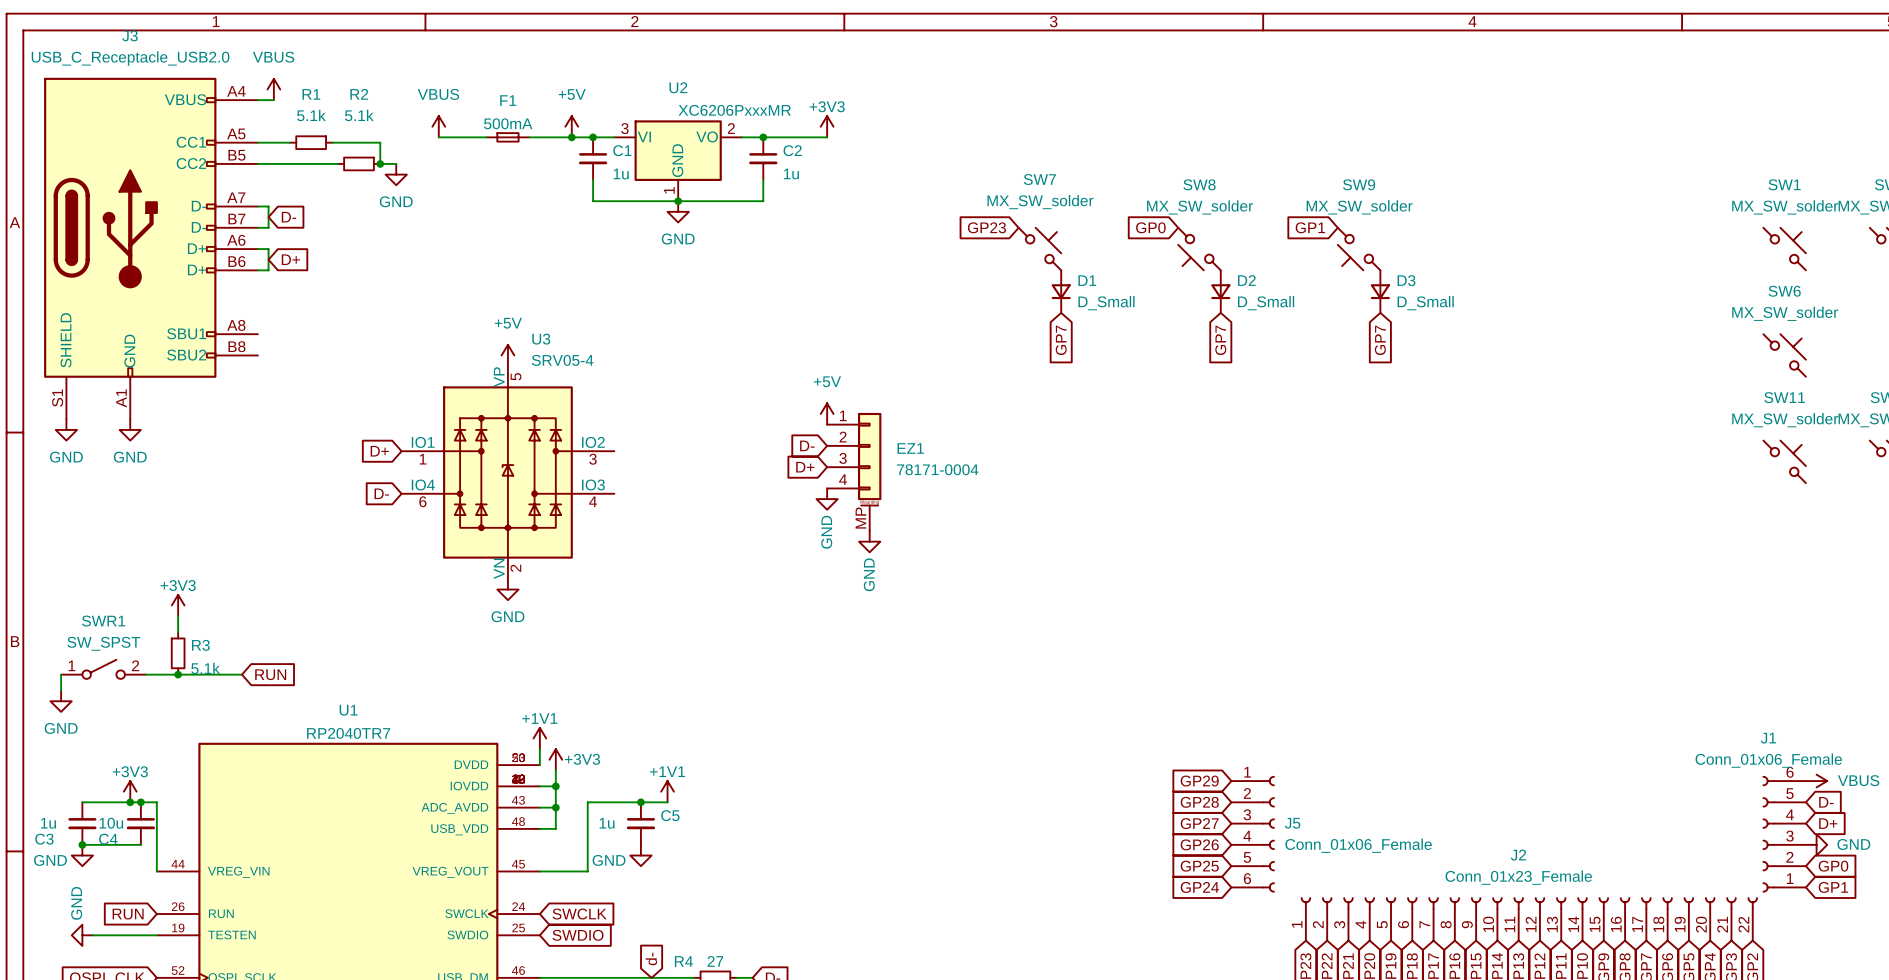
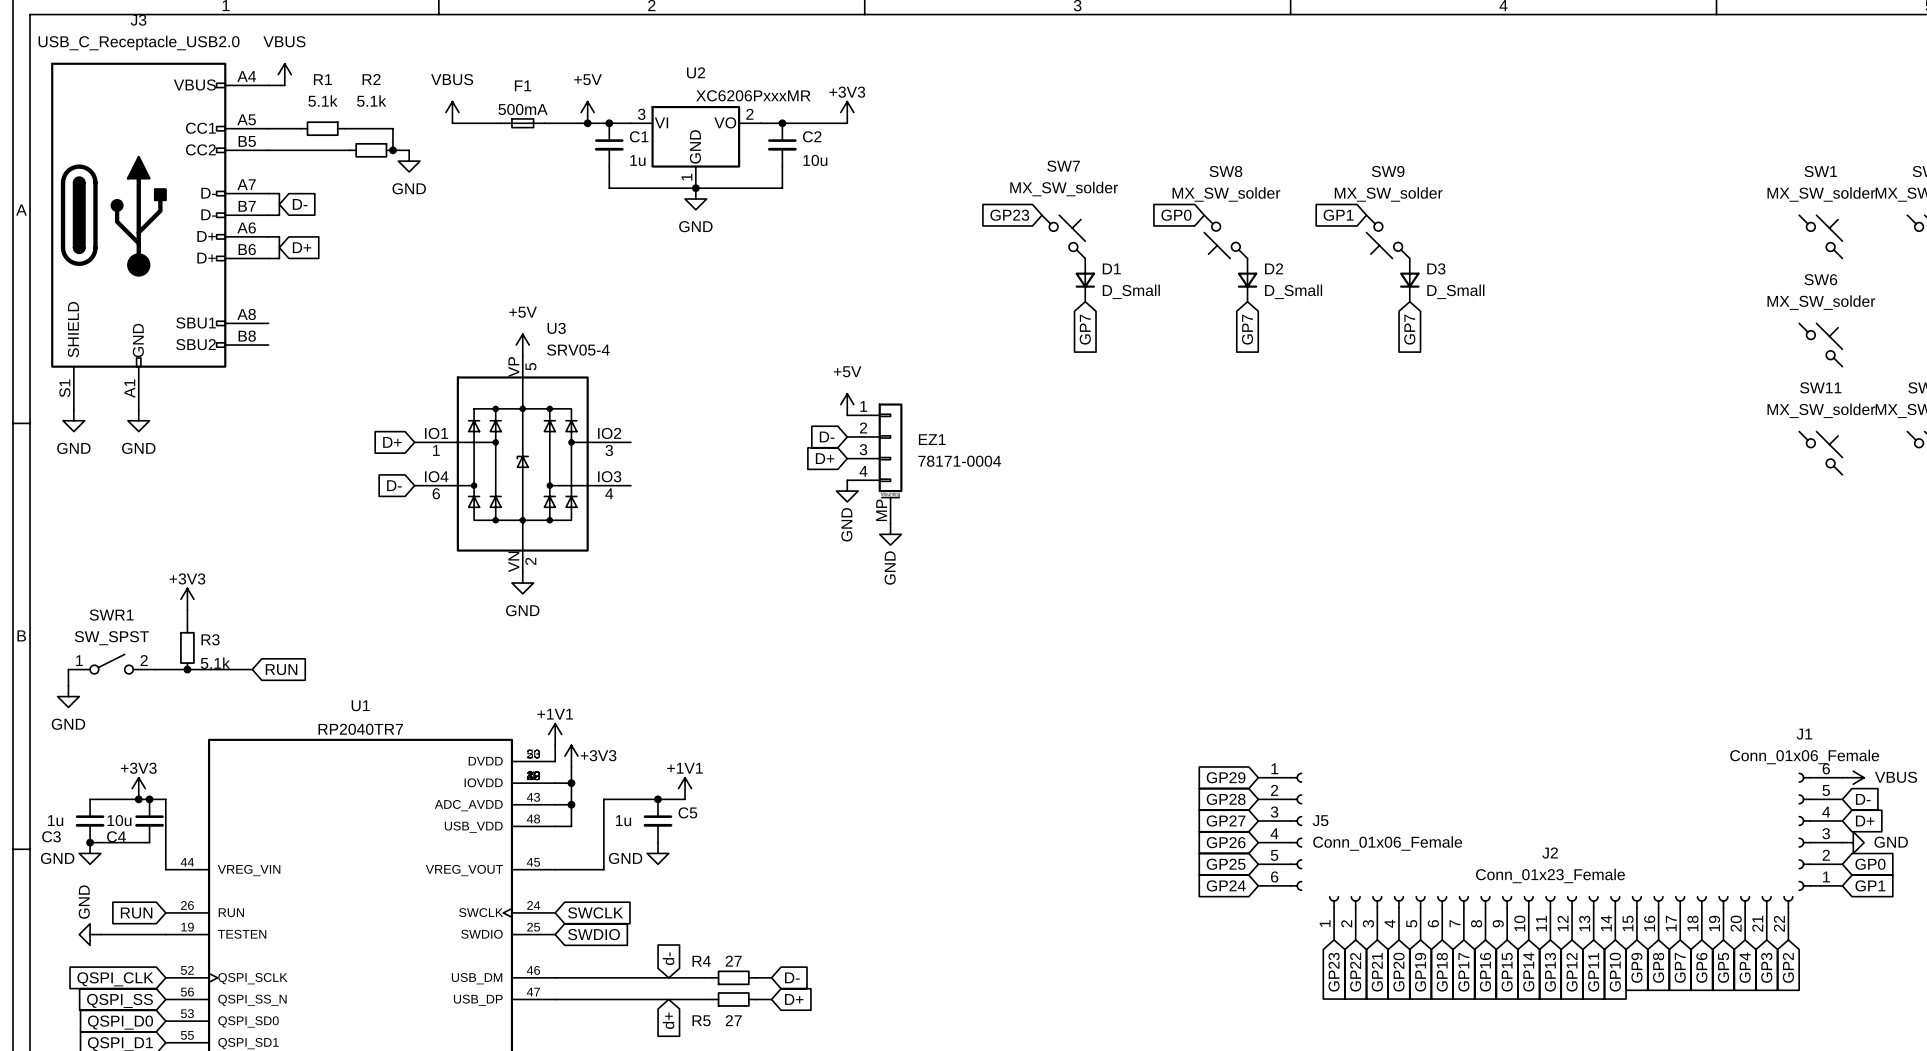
C2 value: 1u (791, 174) -> 10u (815, 160)

